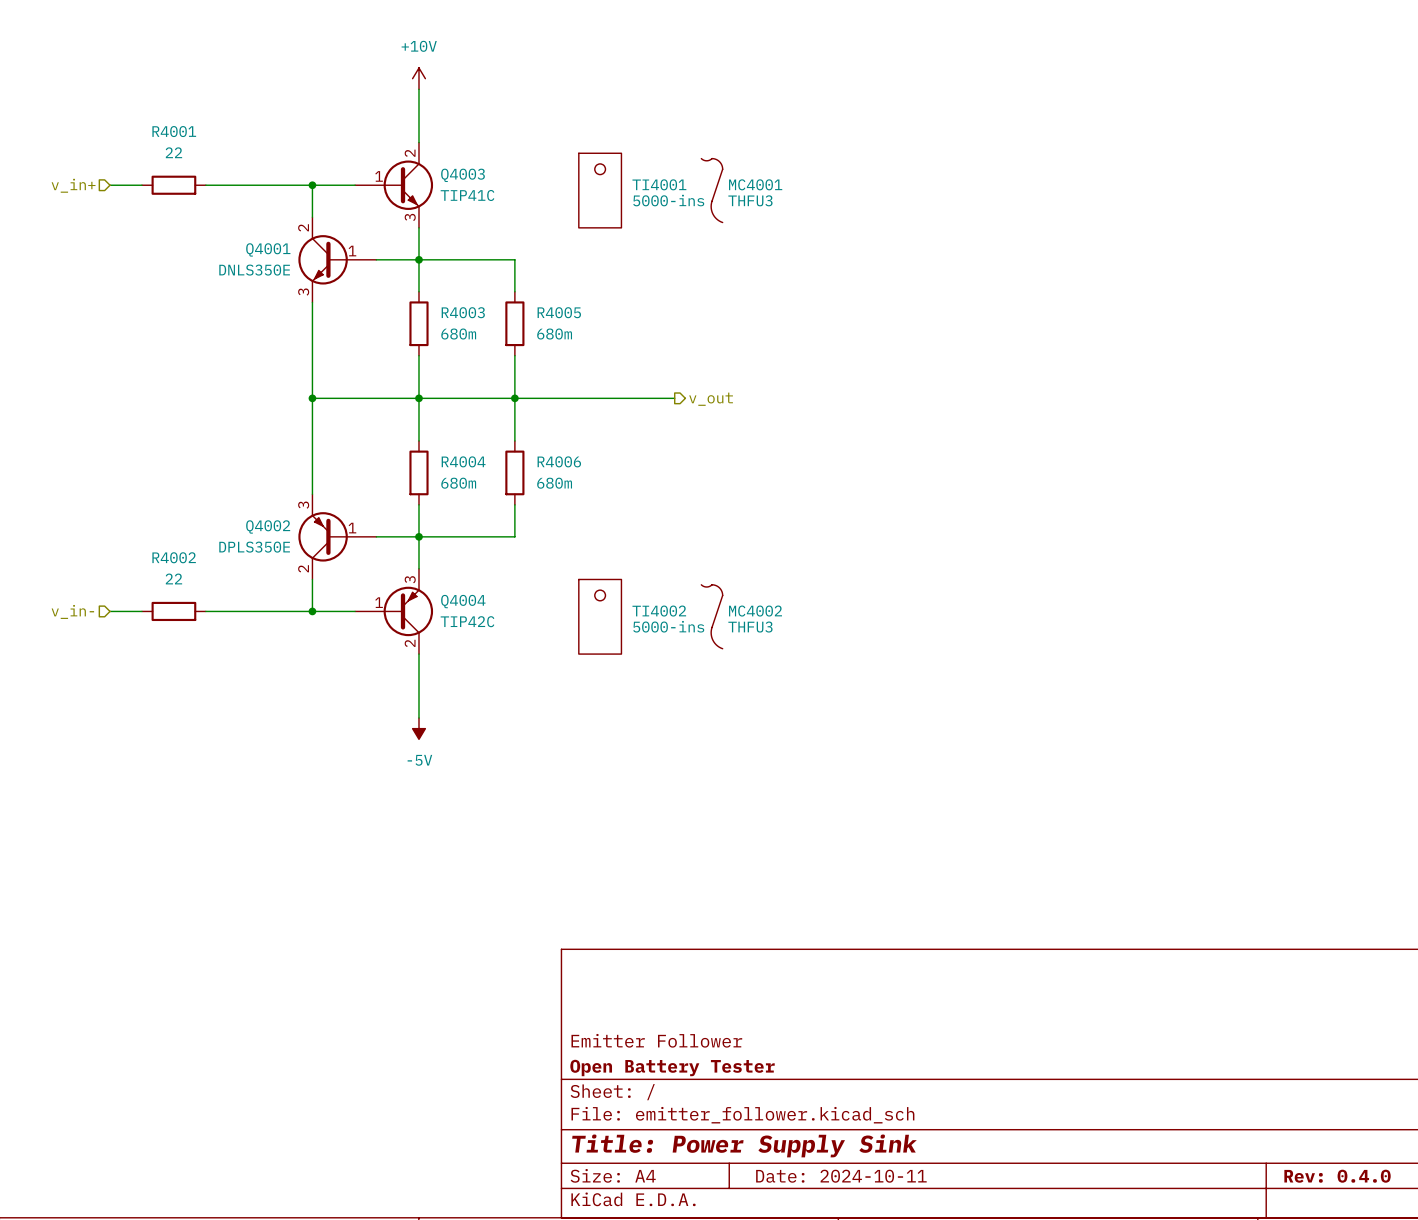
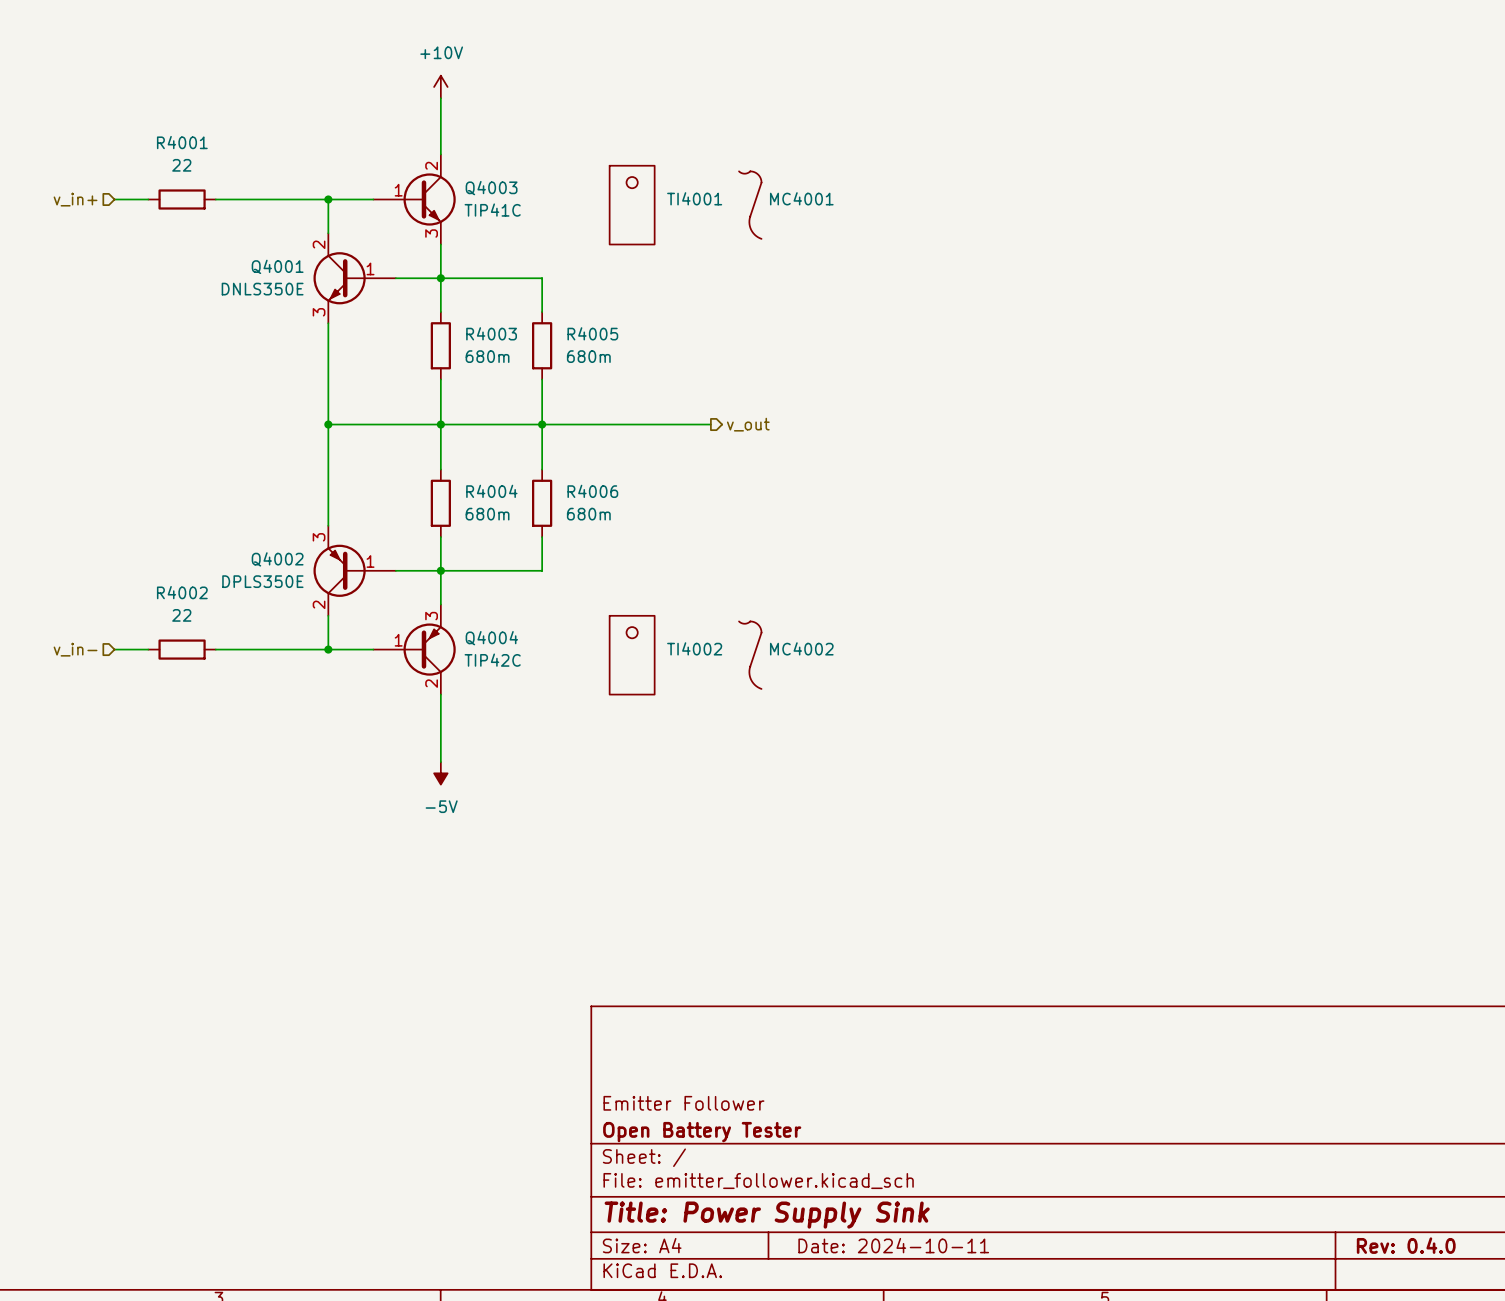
TI4001 value: 5000-ins (668, 200) -> none
MC4001 value: THFU3 (750, 200) -> none
TI4002 value: 5000-ins (668, 626) -> none
MC4002 value: THFU3 (750, 627) -> none

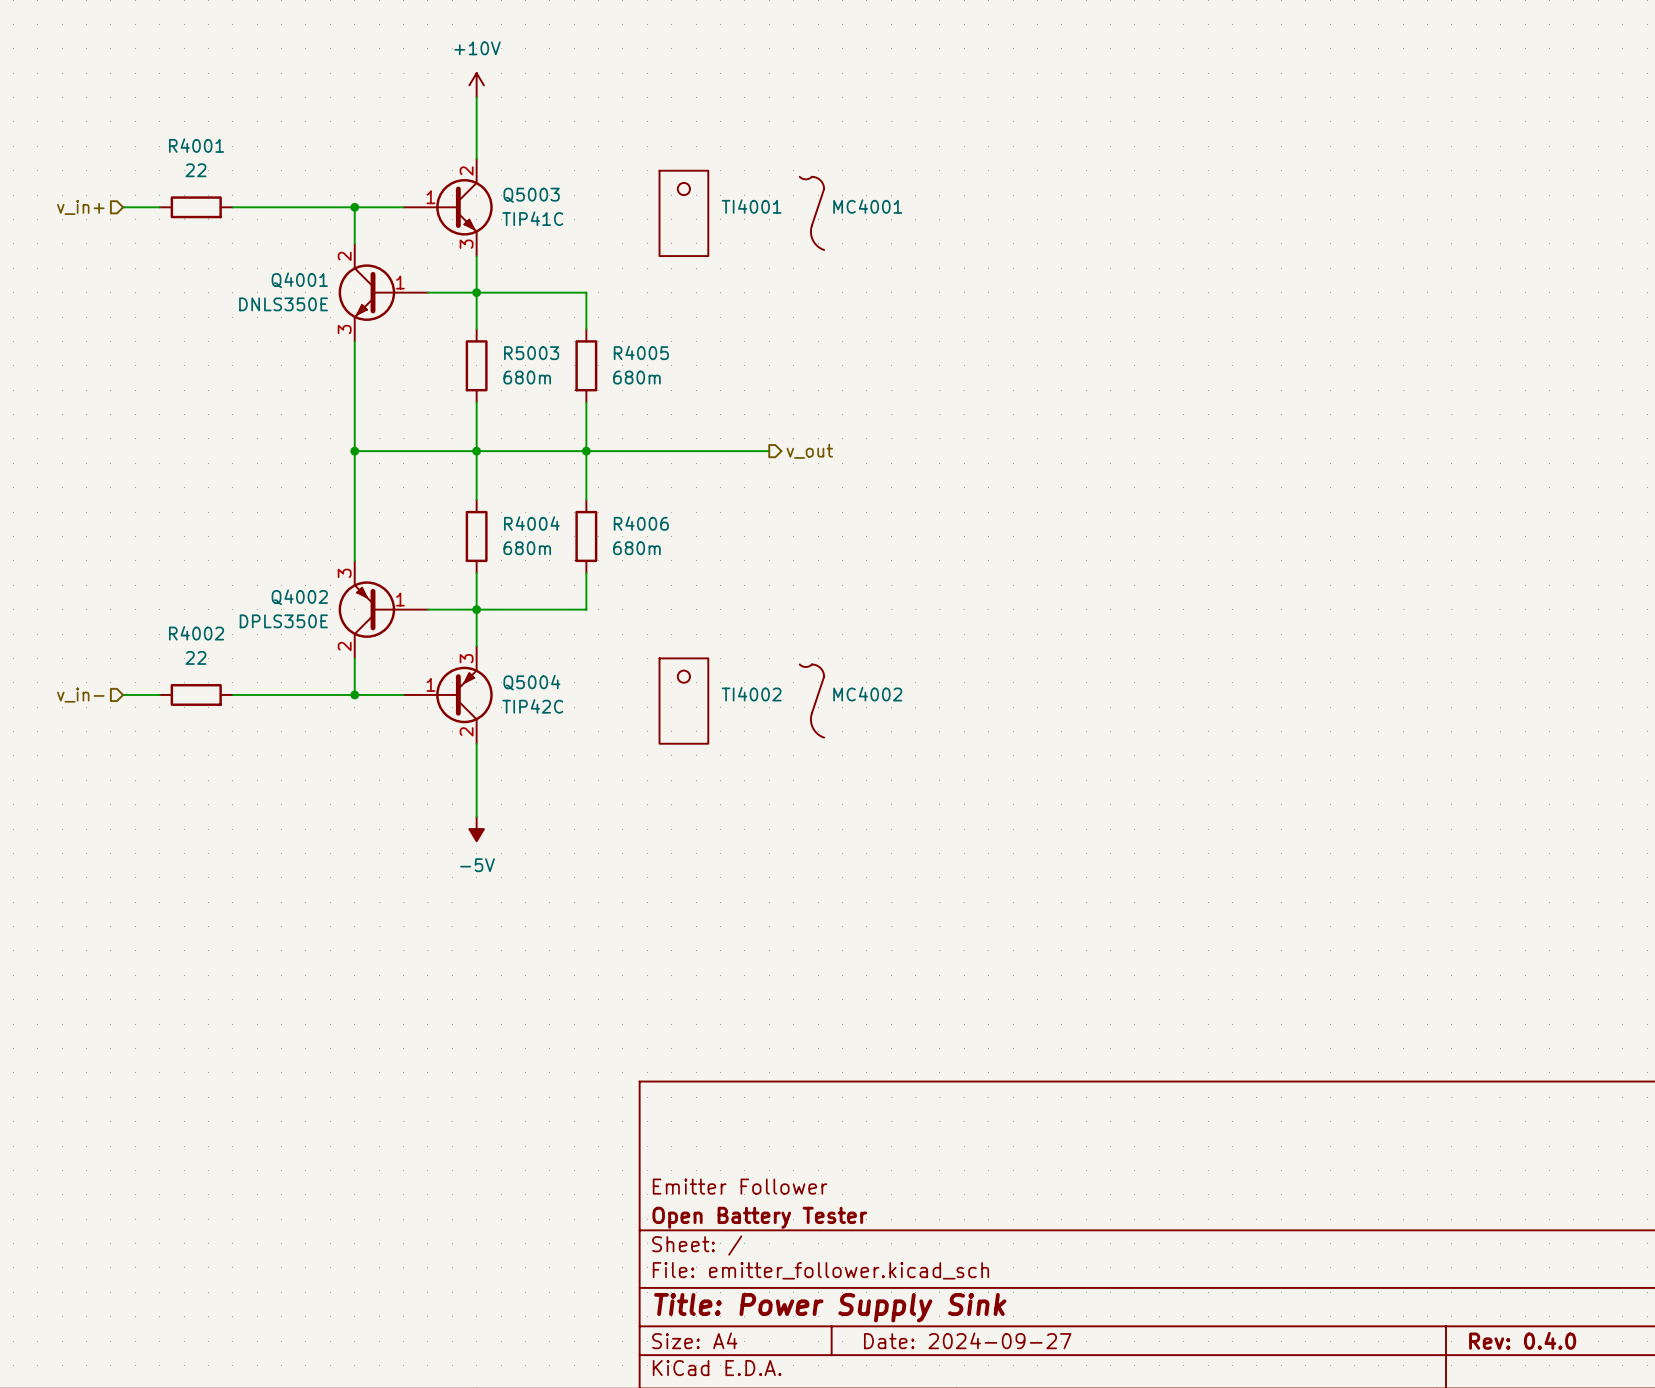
Q4003 name: Q4003 (491, 188) -> Q5003 (531, 195)
R4003 name: R4003 (491, 333) -> R5003 (531, 353)
Q4004 name: Q4004 (491, 638) -> Q5004 (531, 682)
title block: Date: 2024-10-11 (893, 1245) -> Date: 2024-09-27 (967, 1340)

